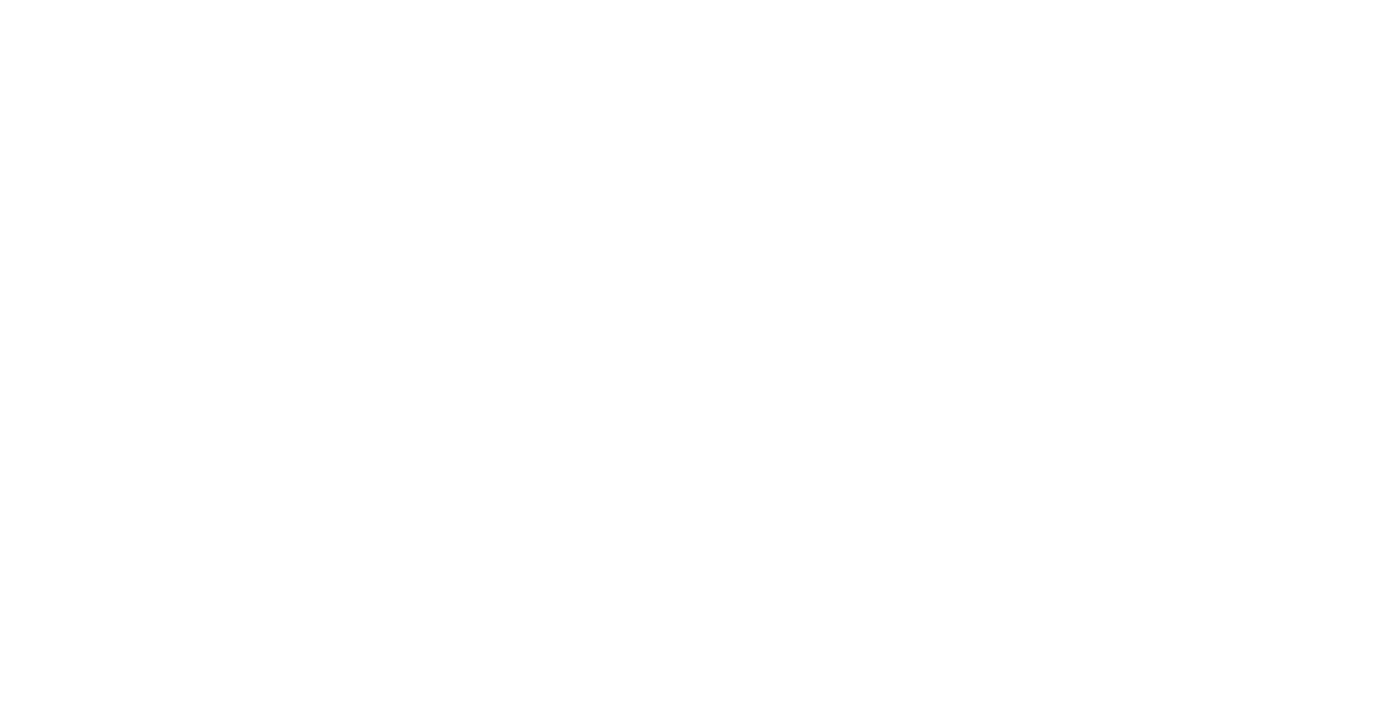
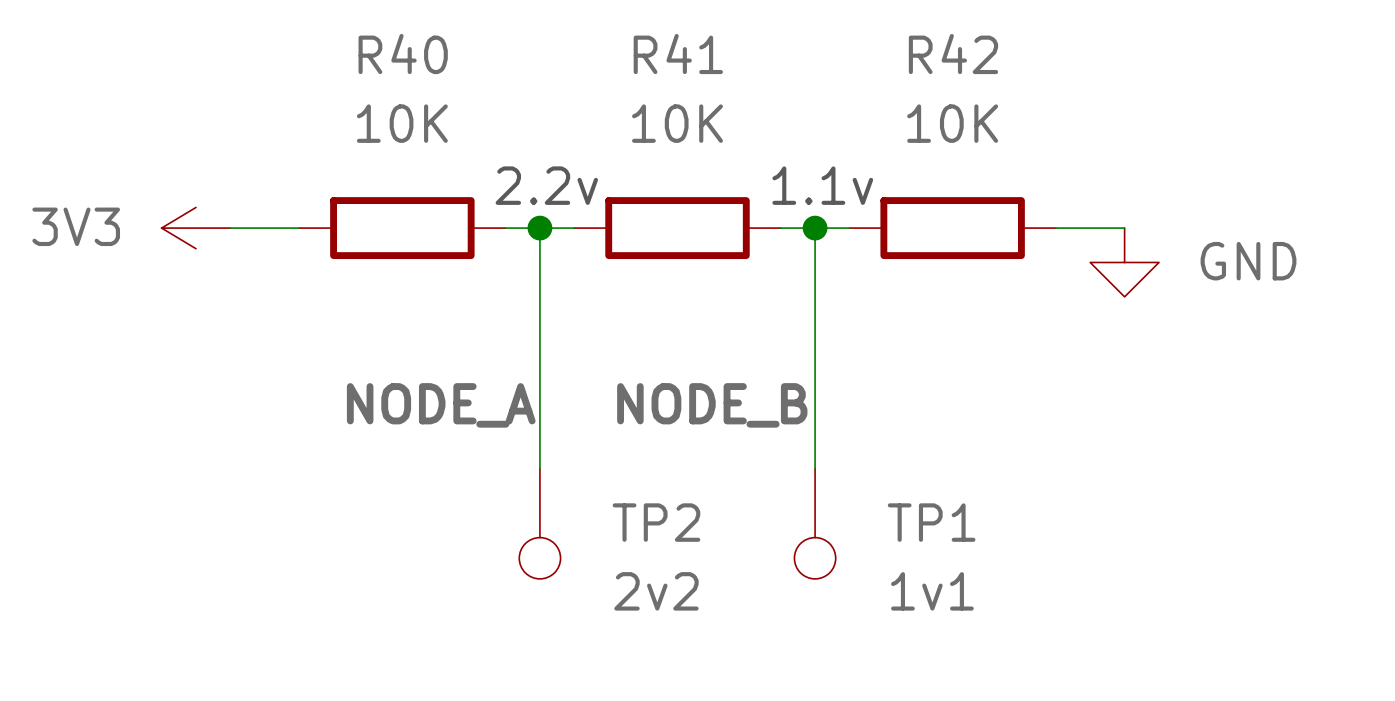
text: none -> 2.2v (546, 185)
text: none -> 1.1v (822, 185)
power symbol: none -> 3V3 (196, 228)
wire: none -> (230, 228) (299, 228)
R40: none -> 10K (402, 228)
wire: none -> (505, 228) (574, 228)
wire: none -> (539, 228) (539, 468)
junction: none -> (539, 228)
R41: none -> 10K (677, 228)
wire: none -> (780, 228) (849, 228)
wire: none -> (815, 228) (815, 468)
junction: none -> (815, 228)
R42: none -> 10K (952, 228)
wire: none -> (1055, 228) (1124, 228)
power symbol: none -> GND (1124, 262)
label: none -> NODE_A (441, 405)
label: none -> NODE_B (712, 405)
TP2: none -> 2v2 (539, 523)
TP1: none -> 1v1 (815, 523)

